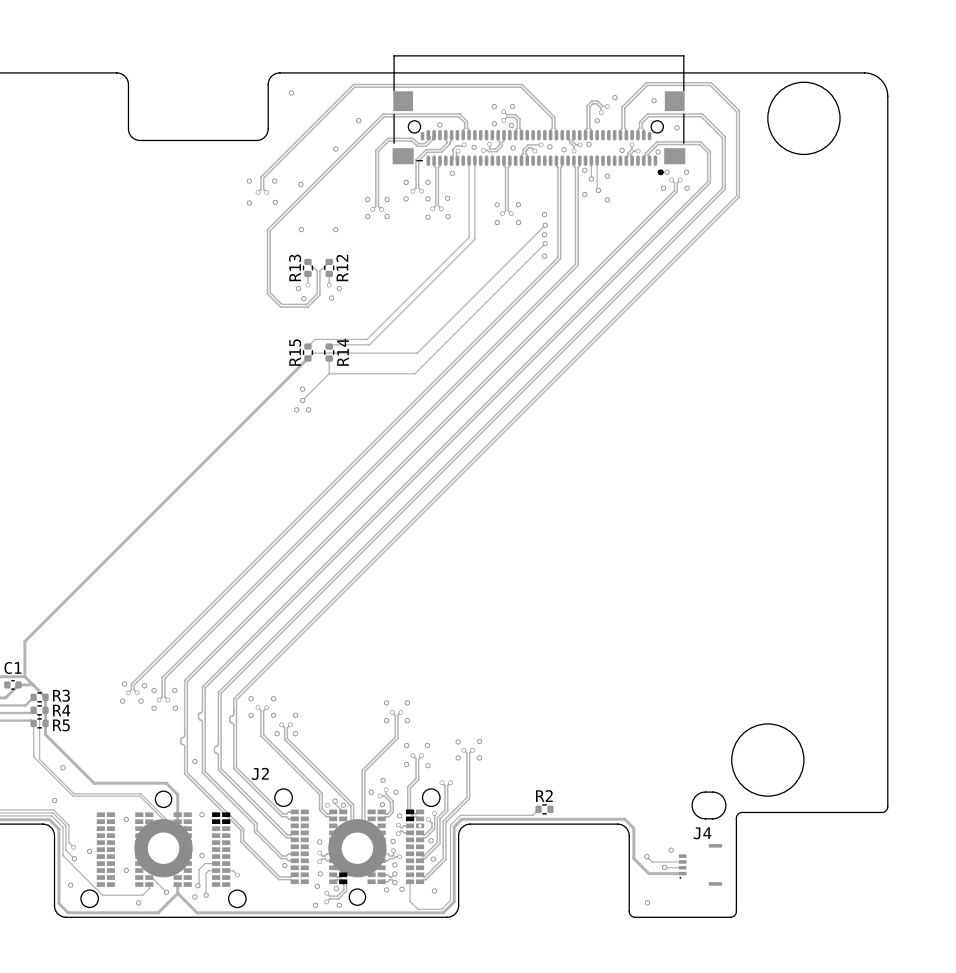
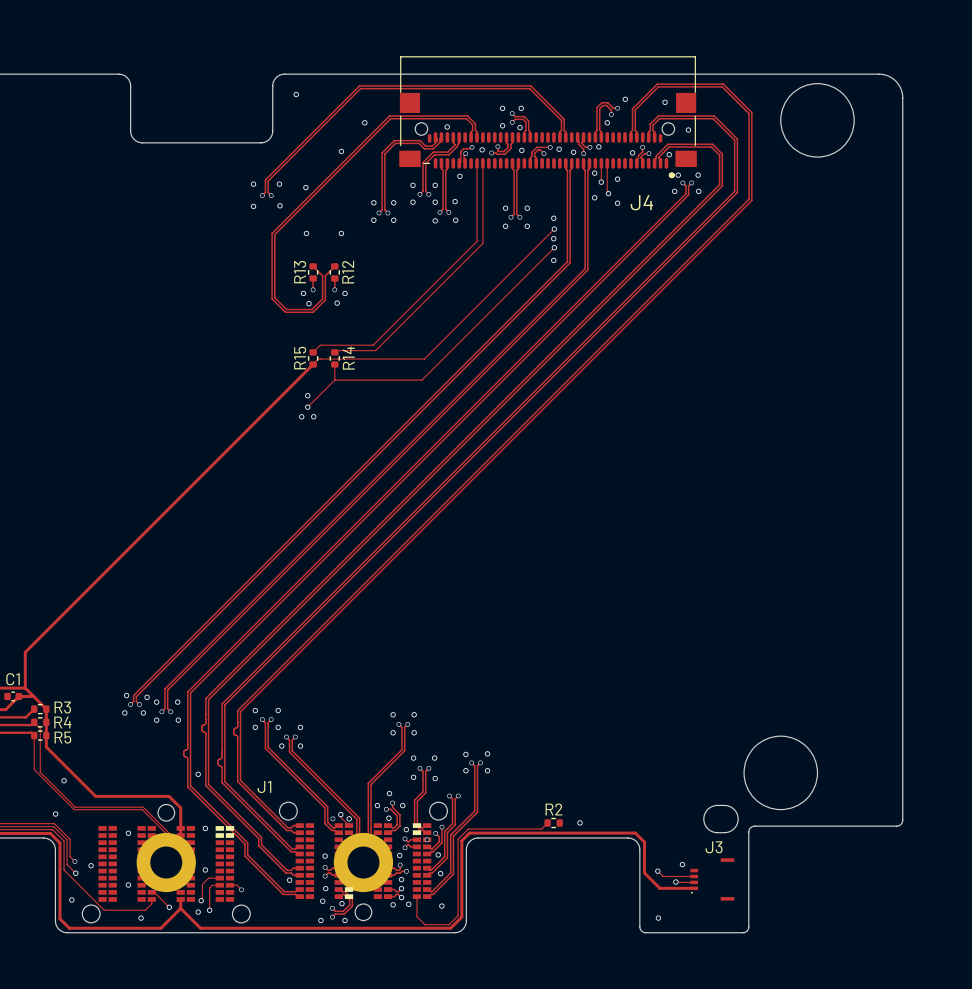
J4 name: none -> J4 (641, 202)
J2 name: J2 (260, 773) -> J1 (264, 787)
via: none -> (579, 822)
J4 name: J4 (702, 833) -> J3 (714, 847)

